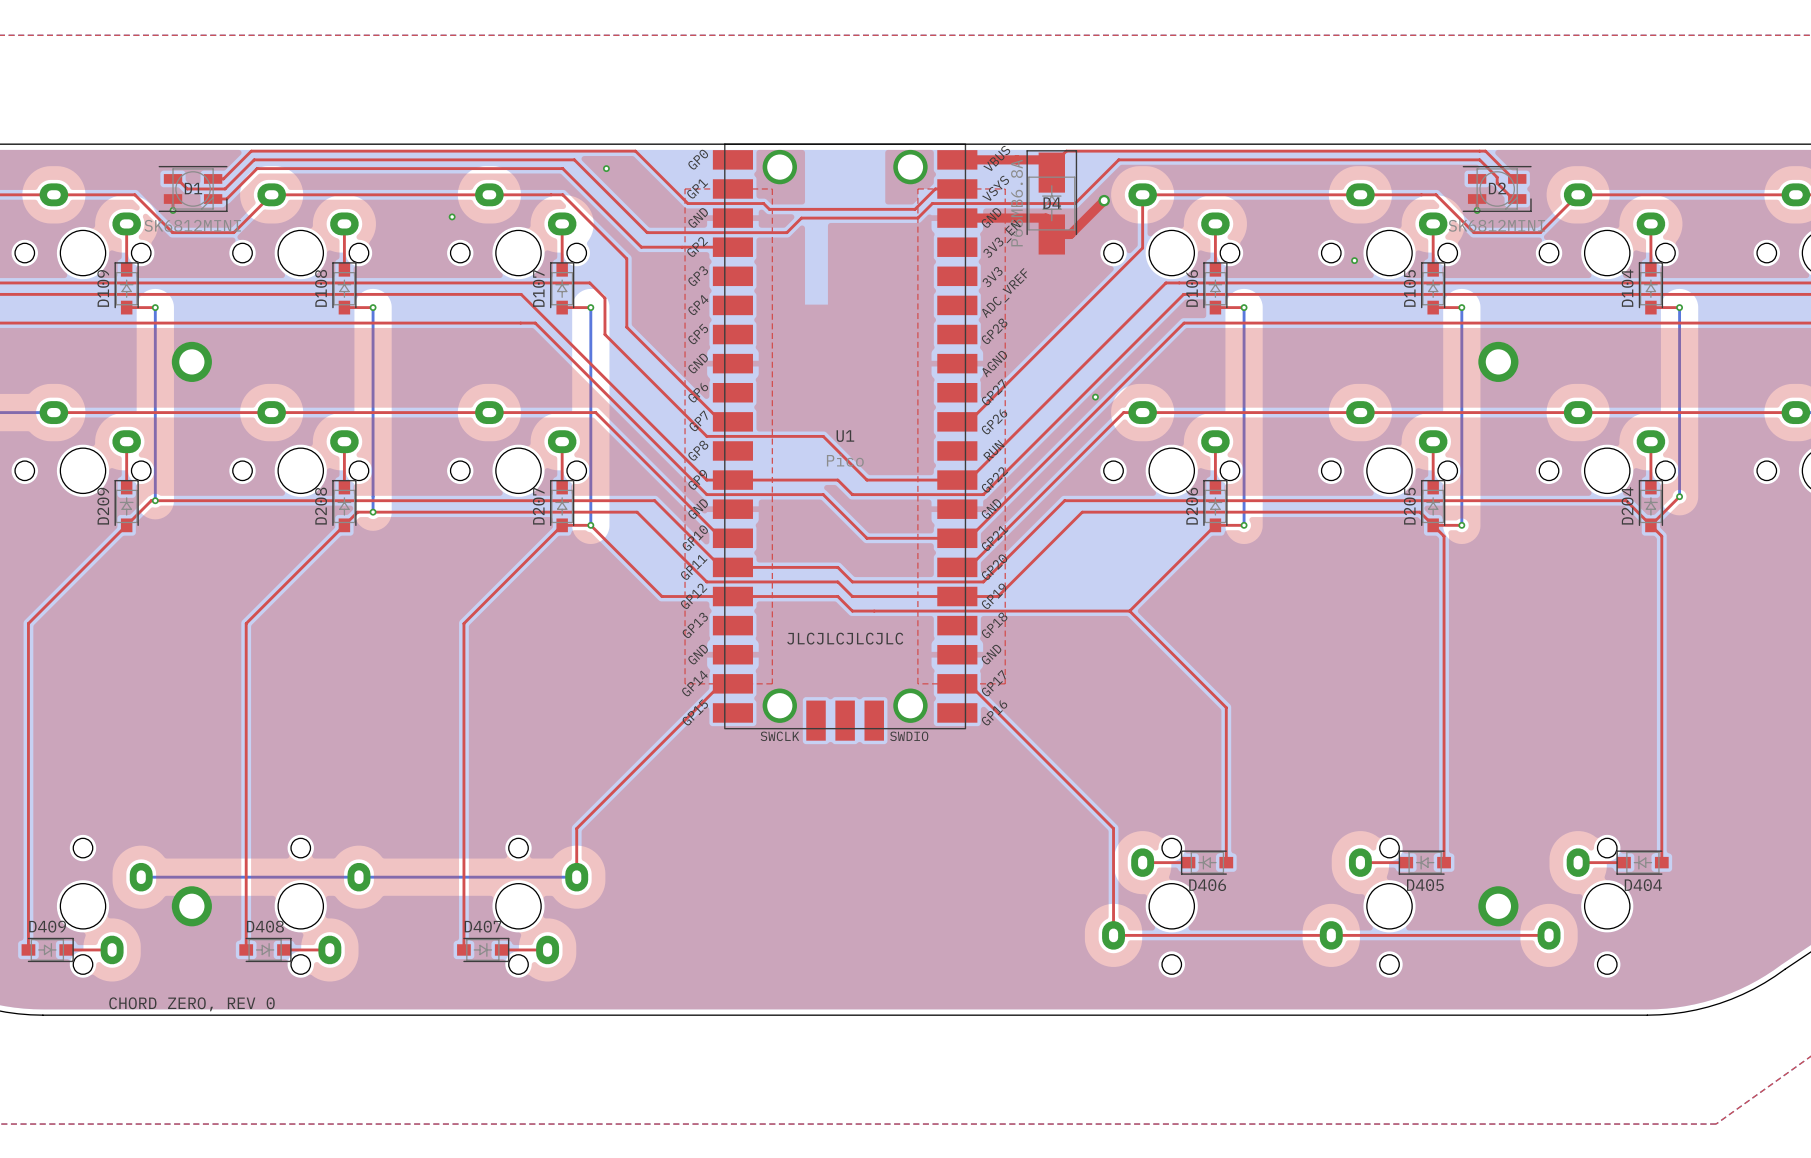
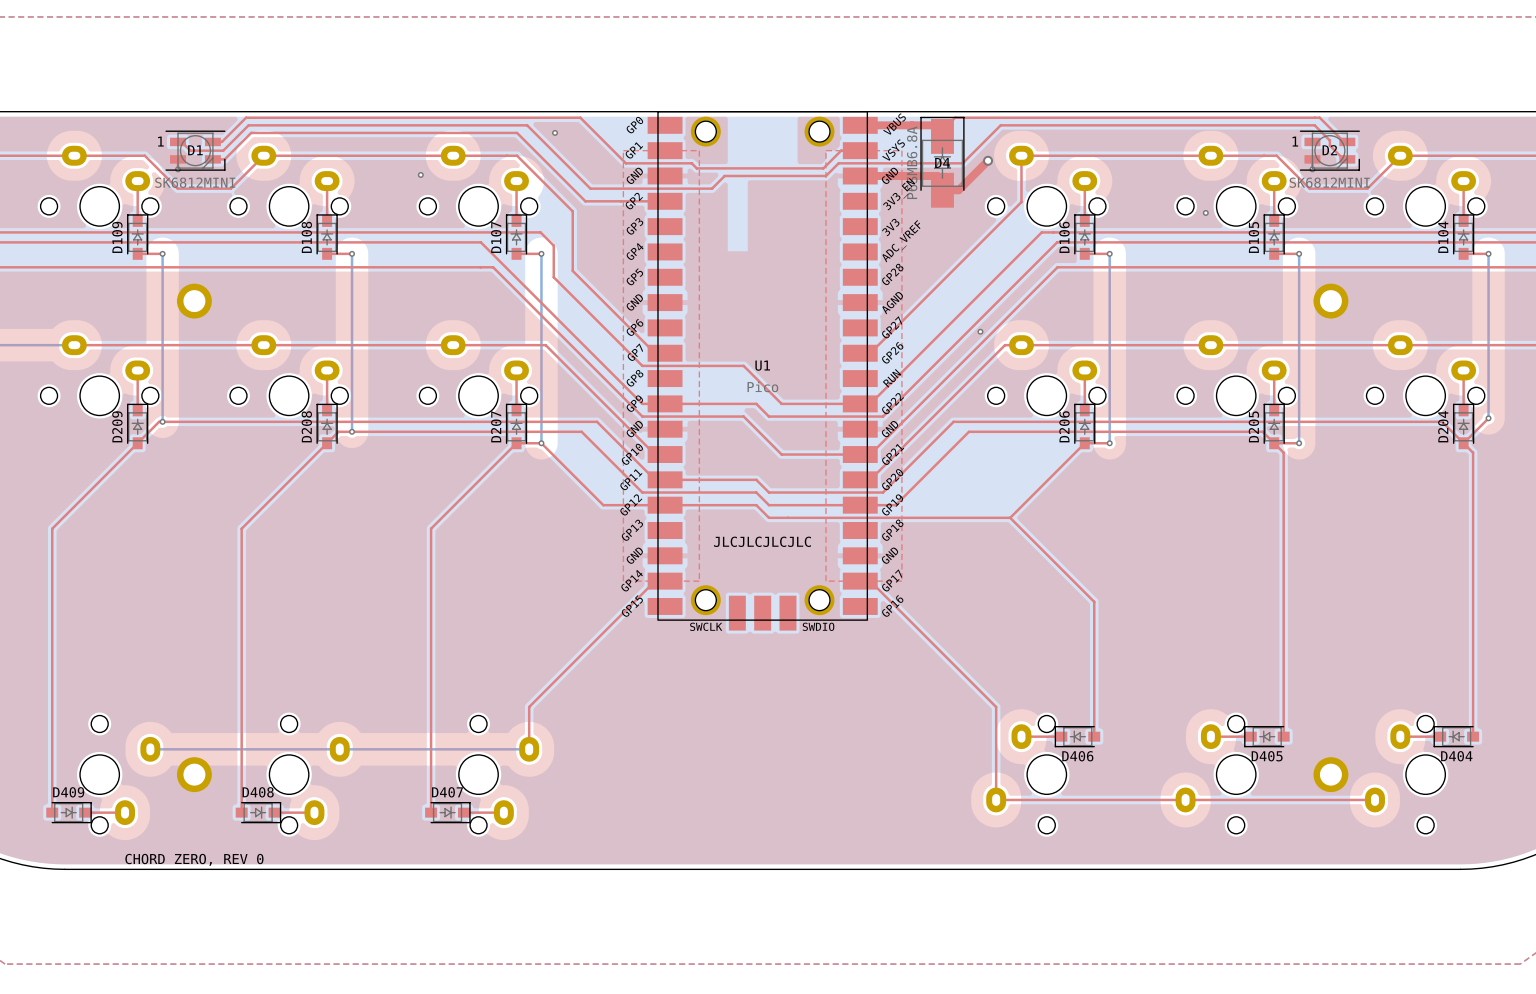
U1 footprint: [712, 143, 978, 741] -> [647, 111, 878, 631]
D1 text: none -> 1 (160, 141)
D2 text: none -> 1 (1295, 141)

